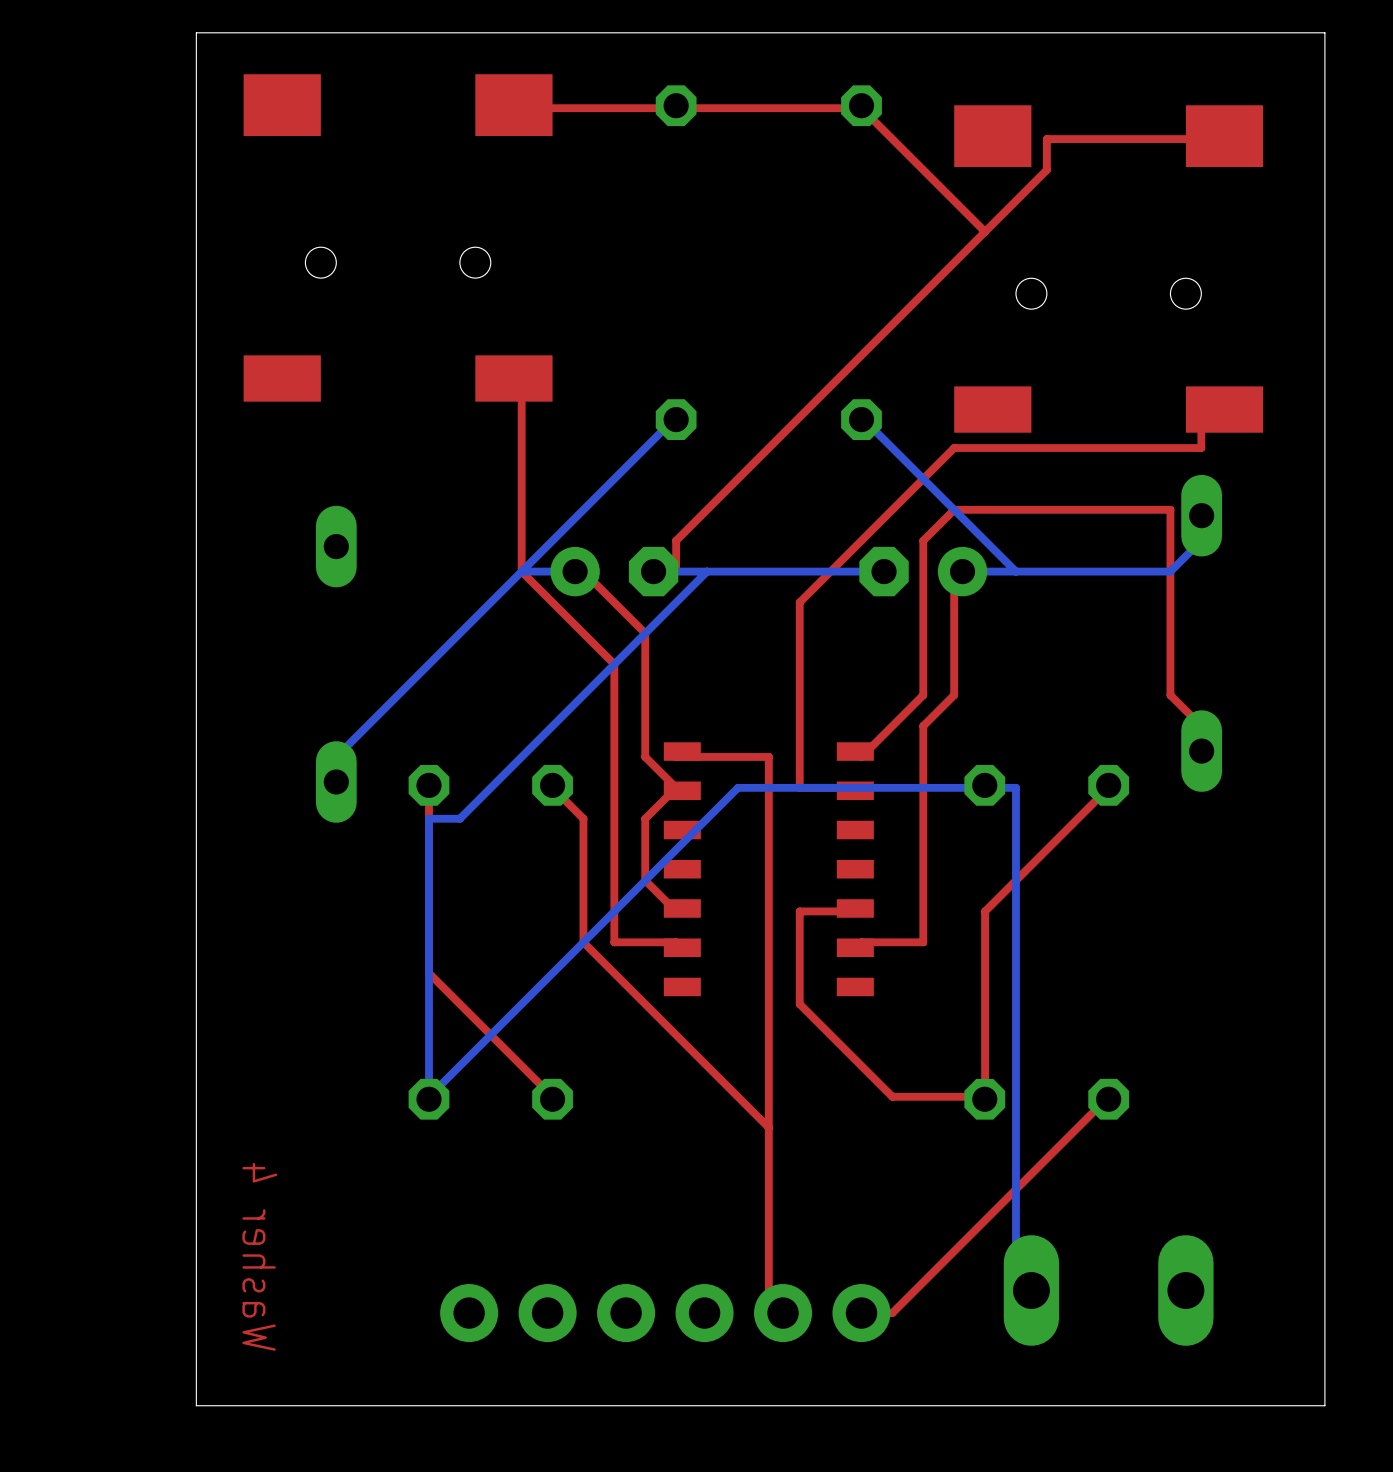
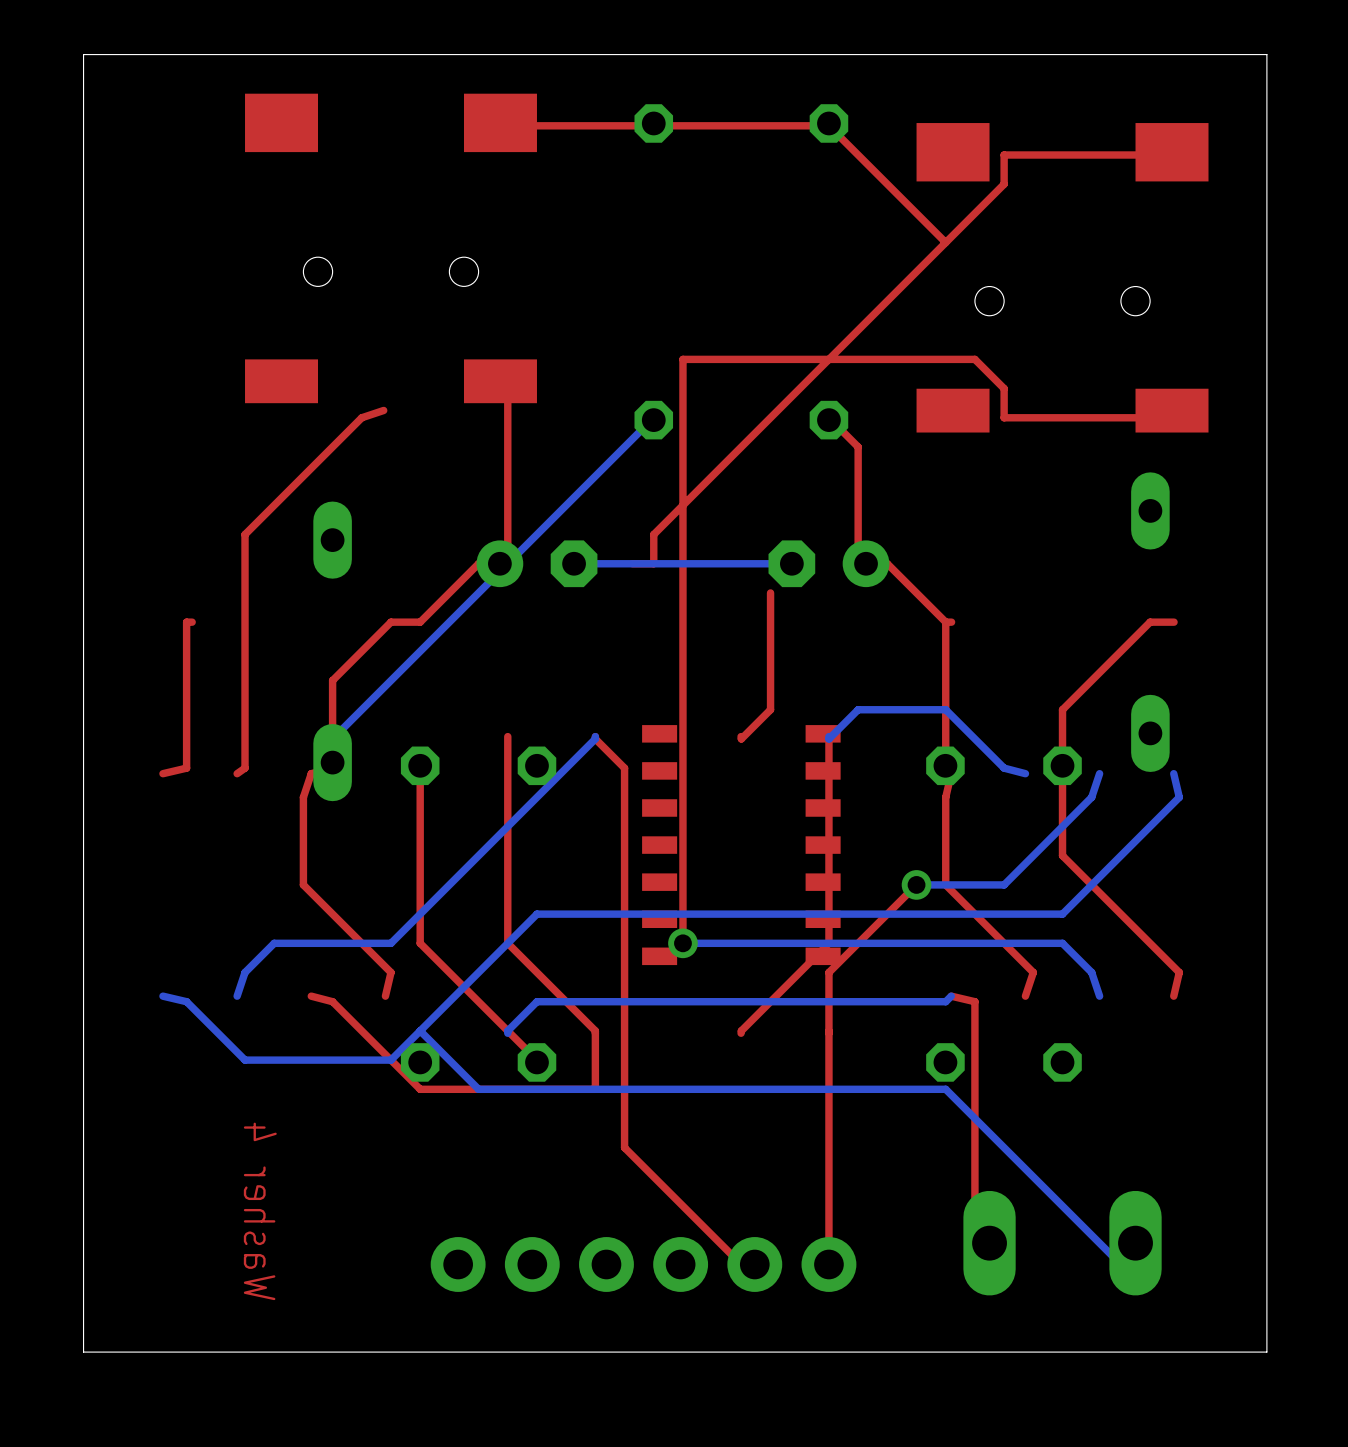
board edge: (196, 32) (196, 1405) -> (200, 54) (83, 54) (83, 1352) (200, 1352)
top track: none -> (383, 410) (361, 417) (245, 534) (245, 768) (237, 773)
top track: (1201, 417) (1201, 448) (954, 448) (799, 602) -> (1150, 417) (1004, 417) (1004, 388) (974, 359) (682, 359) (682, 943)
bottom track: (861, 419) (861, 417) (1015, 571) -> none
top track: none -> (828, 420) (828, 417) (858, 446) (858, 563) (887, 563) (945, 622)
bottom track: (1201, 515) (1201, 540) (1170, 571) (962, 571) -> none
top track: (521, 571) (614, 664) (614, 754) -> (507, 563) (478, 563) (420, 622) (391, 622) (332, 680) (332, 768) (311, 773) (303, 797) (303, 884) (391, 972) (385, 996)
bottom track: (575, 571) (521, 571) -> none
top track: (575, 571) (583, 571) (645, 633) (645, 756) (676, 787) -> none
part position: (614, 571) -> (536, 563)
bottom track: (707, 571) (459, 818) (428, 818) (428, 1099) -> none
bottom track: (884, 571) (822, 571) -> (632, 563) (574, 563)
part position: (923, 571) -> (828, 563)
top track: (962, 571) (954, 571) (954, 695) (923, 726) (923, 942) (861, 942) (855, 947) -> none
top track: none -> (192, 622) (186, 622) (186, 768) (162, 773)
top track: none -> (945, 622) (945, 768) (951, 773) (945, 797) (945, 884) (1033, 972) (1025, 996)
top track: none -> (951, 622) (945, 622)
top track: none -> (1174, 622) (1150, 622) (1062, 709) (1062, 765)
top track: (799, 726) (799, 787) (861, 787) (855, 790) -> (770, 709) (741, 738) (741, 736)
top track: (682, 751) (676, 756) (768, 756) (768, 1313) -> (624, 855) (624, 1147) (741, 1264)
top track: (1201, 751) (1201, 726) (1170, 695) (1170, 509) (954, 509) (923, 540) (923, 695) (861, 756) (855, 751) -> none
top track: none -> (507, 736) (507, 943) (595, 1030) (595, 1089) (420, 1089) (332, 1001) (311, 996)
bottom track: none -> (595, 736) (595, 738) (391, 943) (274, 943) (245, 972) (237, 996)
bottom track: none -> (828, 736) (828, 738) (858, 709) (945, 709) (1004, 768) (1025, 773)
top track: none -> (828, 736) (828, 943) (741, 1033)
top track: (614, 756) (614, 942) (676, 942) (682, 947) -> none
top track: (552, 785) (552, 787) (583, 818) (583, 942) (768, 1127) -> none
top track: (676, 787) (645, 818) -> (595, 738) (624, 768) (624, 797)
top track: (1108, 787) (985, 911) (985, 1096) -> (1062, 768) (1062, 855) (1179, 972) (1173, 996)
bottom track: none -> (1099, 773) (1091, 797) (1004, 884) (916, 884)
bottom track: none -> (1173, 773) (1179, 797) (1062, 914) (536, 914) (391, 1060) (245, 1060) (186, 1001) (162, 996)
top track: (645, 880) (676, 911) (682, 908) -> none
top track: (855, 908) (861, 911) (799, 911) (799, 1004) (892, 1096) (985, 1096) -> none
via: none -> (916, 884)
bottom track: none -> (682, 943) (1062, 943) (1091, 972) (1099, 996)
via: none -> (682, 943)
bottom track: none -> (951, 996) (945, 1001) (536, 1001) (507, 1030) (507, 1033)
top track: none -> (951, 996) (974, 1001) (974, 1264) (989, 1272)
bottom track: none -> (420, 1030) (478, 1089) (945, 1089) (1120, 1264) (1135, 1272)
bottom track: (428, 1096) (737, 787) (1015, 787) (1015, 1282) (1031, 1290) -> none
top track: (1108, 1099) (1108, 1096) (892, 1313) (861, 1313) -> (916, 884) (828, 972) (828, 1264)

